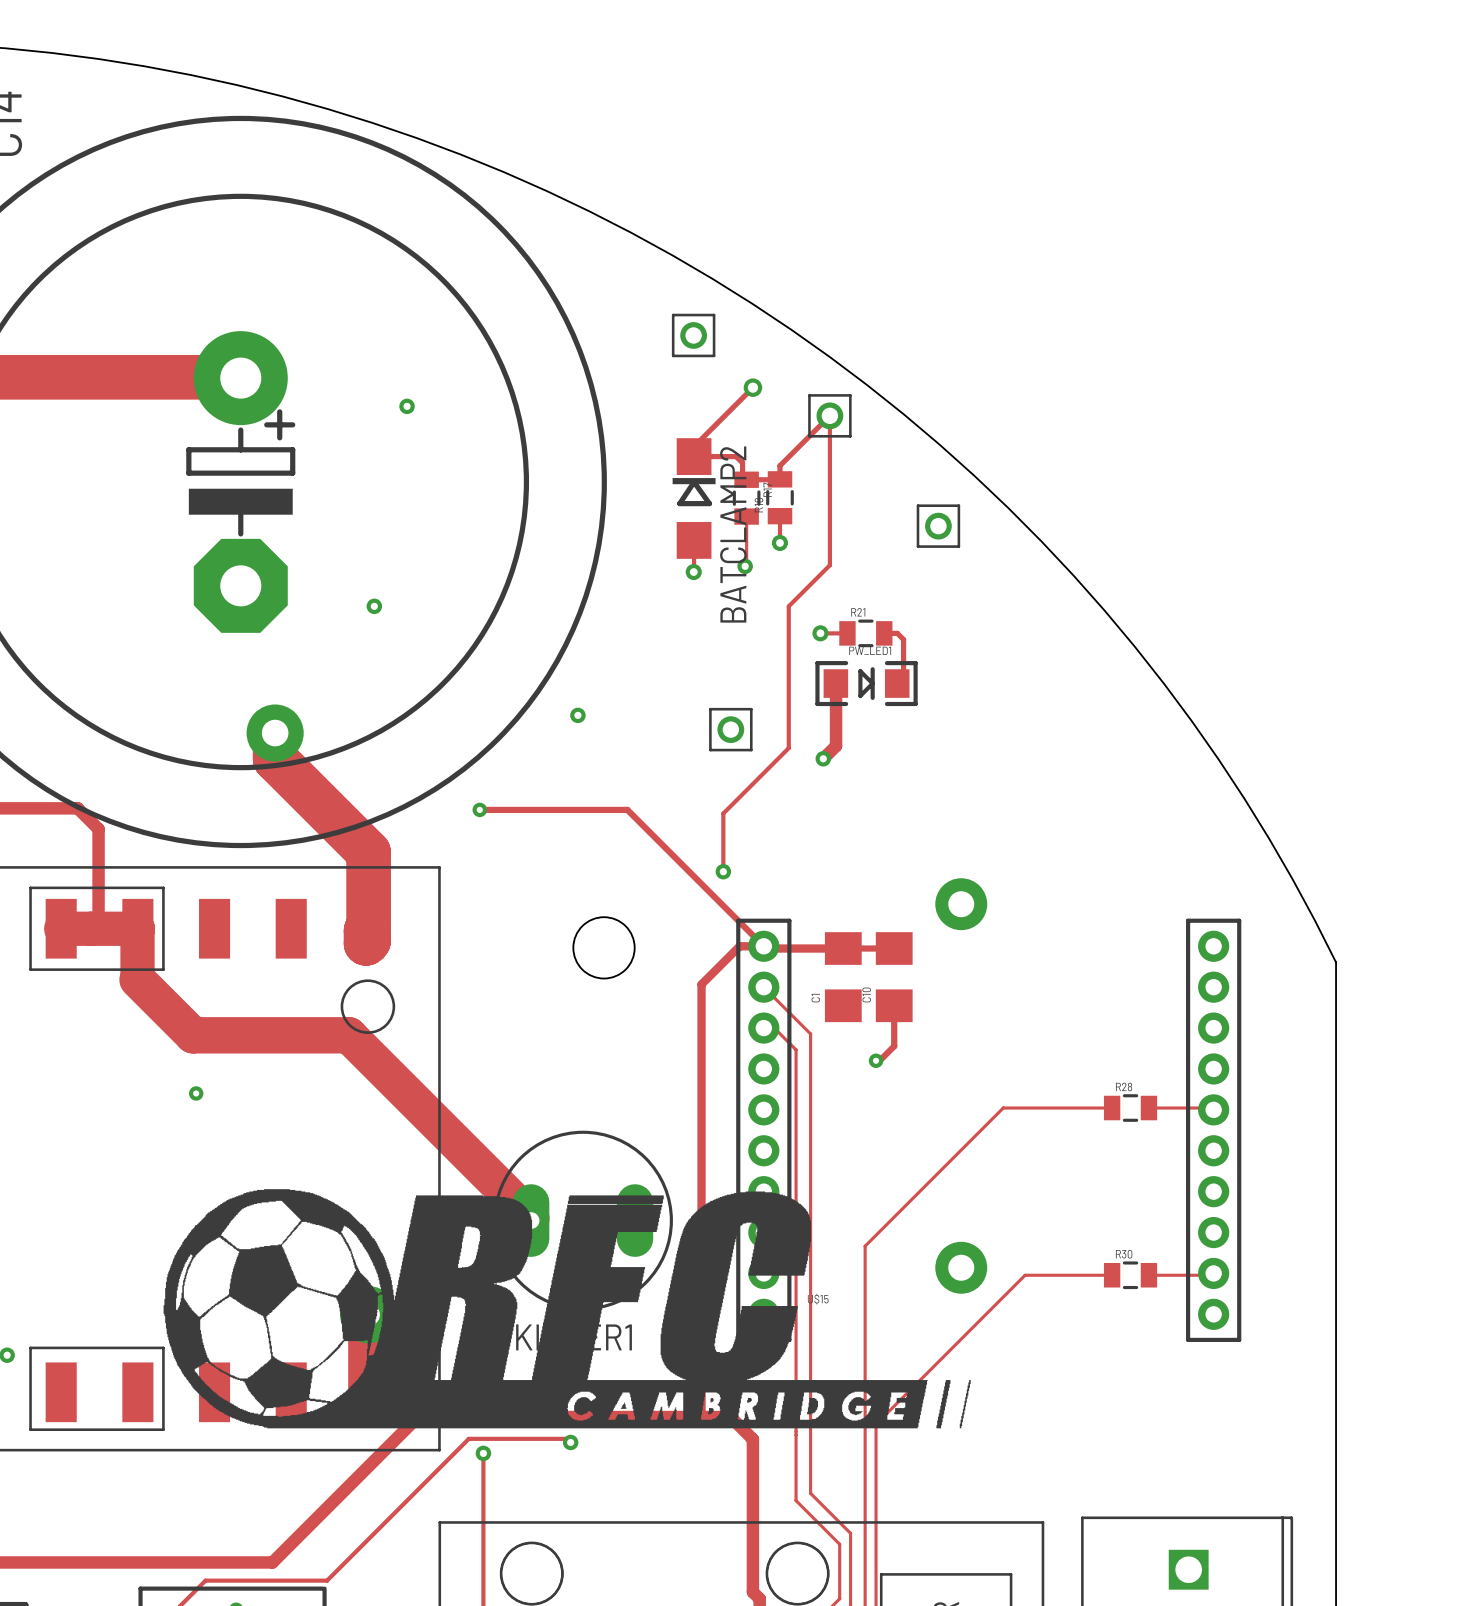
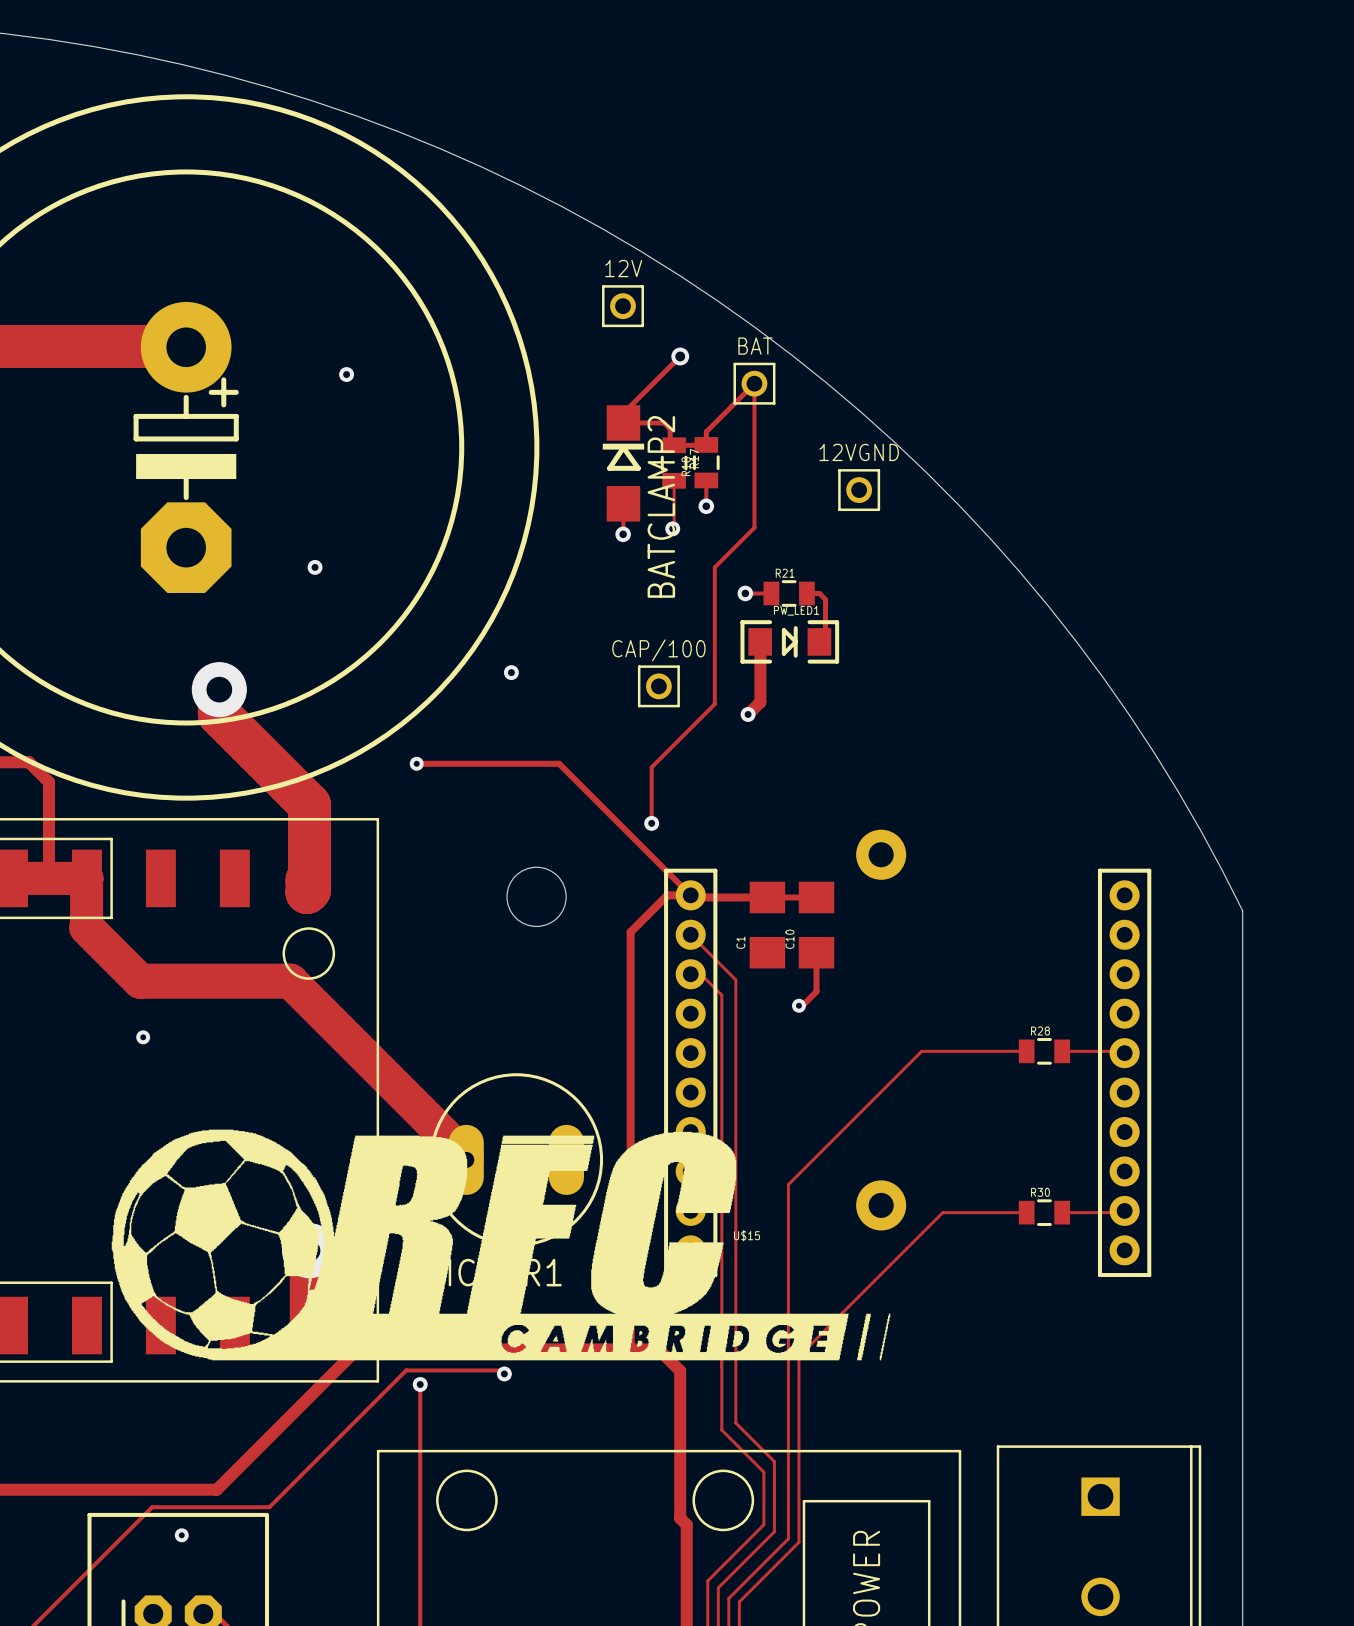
12V name: none -> 12V (623, 268)
BAT name: none -> BAT (755, 346)
12VGND name: none -> 12VGND (859, 452)
CAP/100 name: none -> CAP/100 (658, 650)

